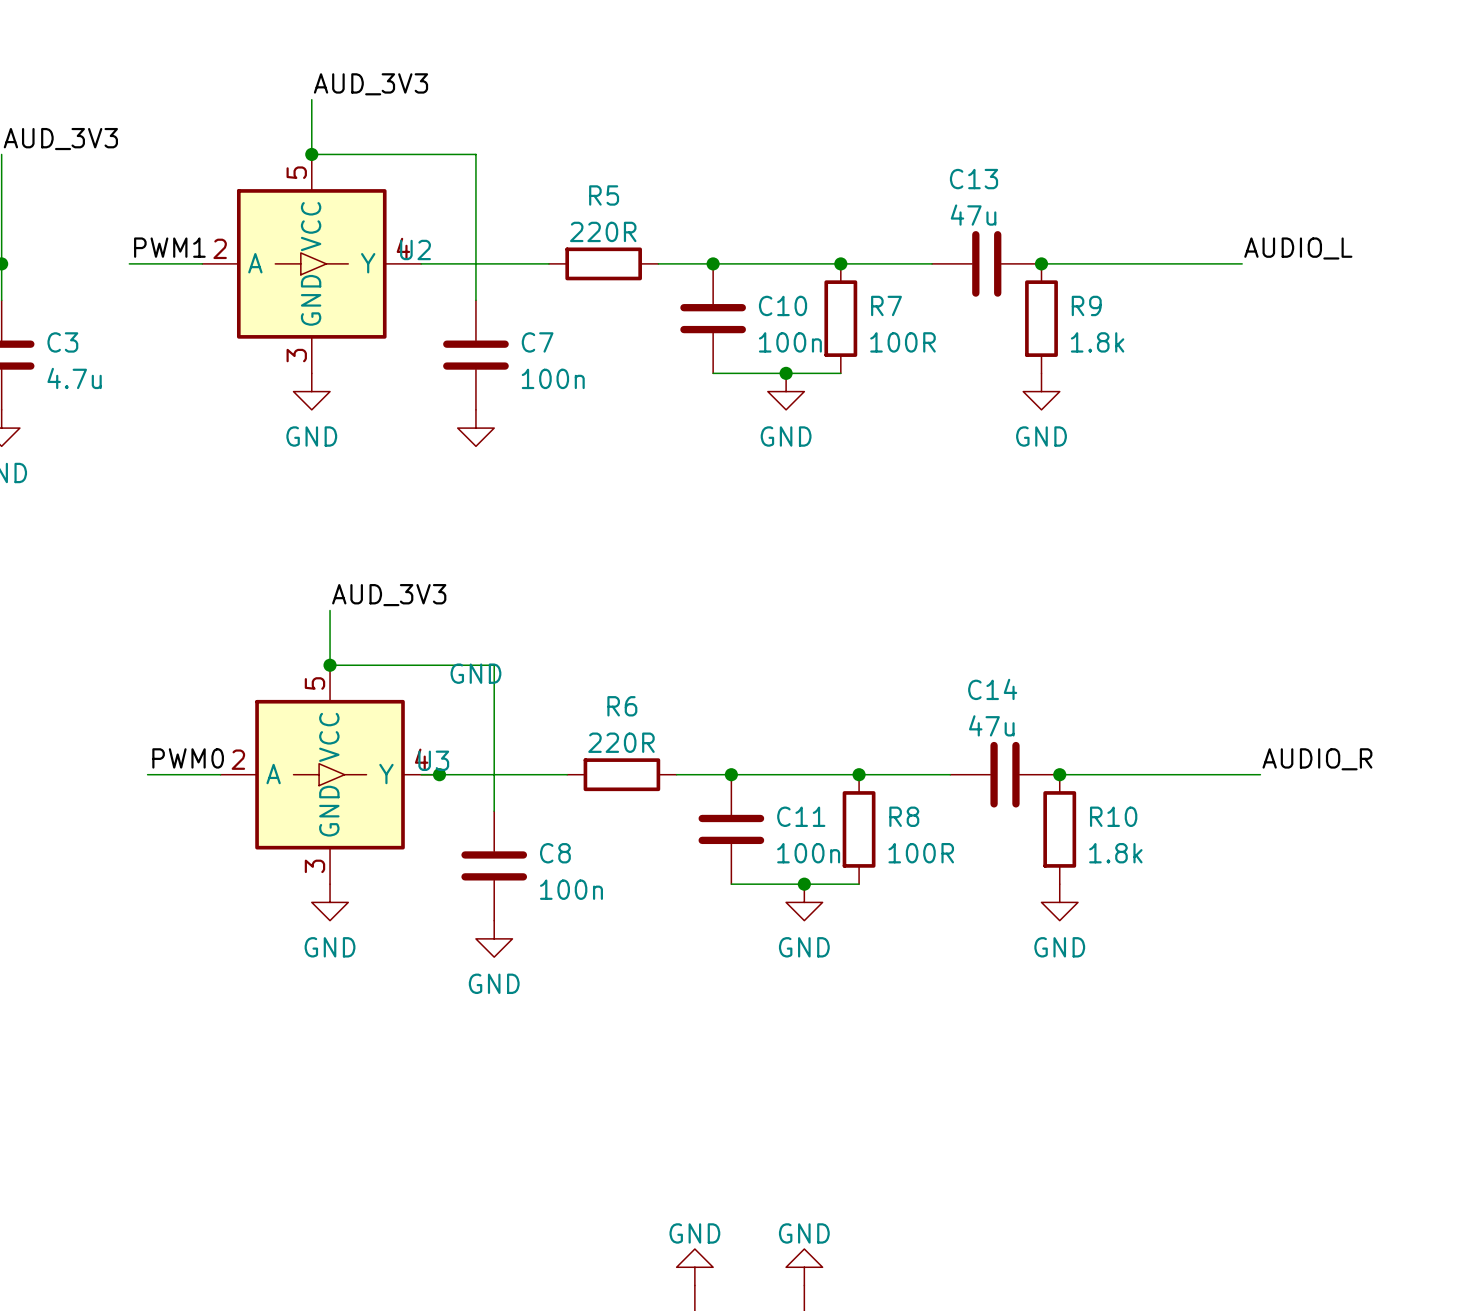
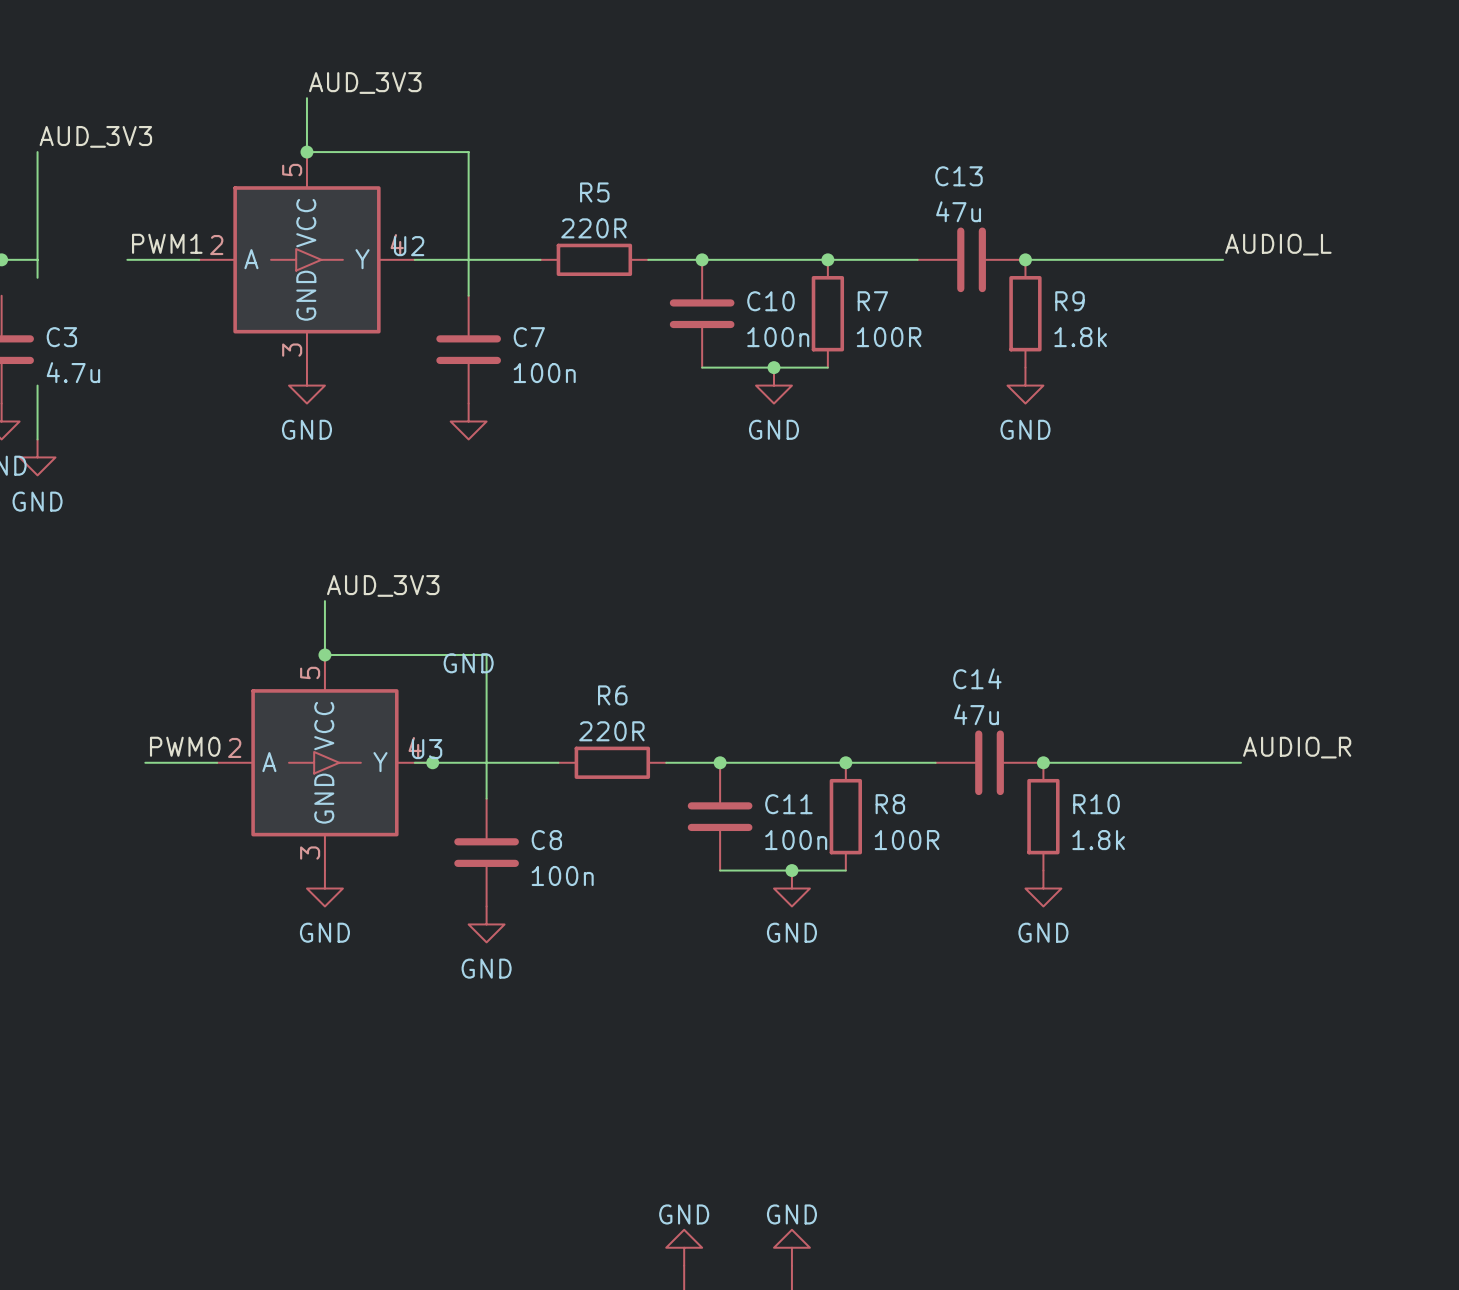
label position: AUD_3V3 (60, 139) -> AUD_3V3 (95, 136)
wire: (1, 154) (1, 300) -> none
wire: none -> (37, 152) (37, 277)
wire: none -> (1, 259) (37, 259)
wire: none -> (37, 385) (37, 439)
power symbol: none -> GND (37, 457)

